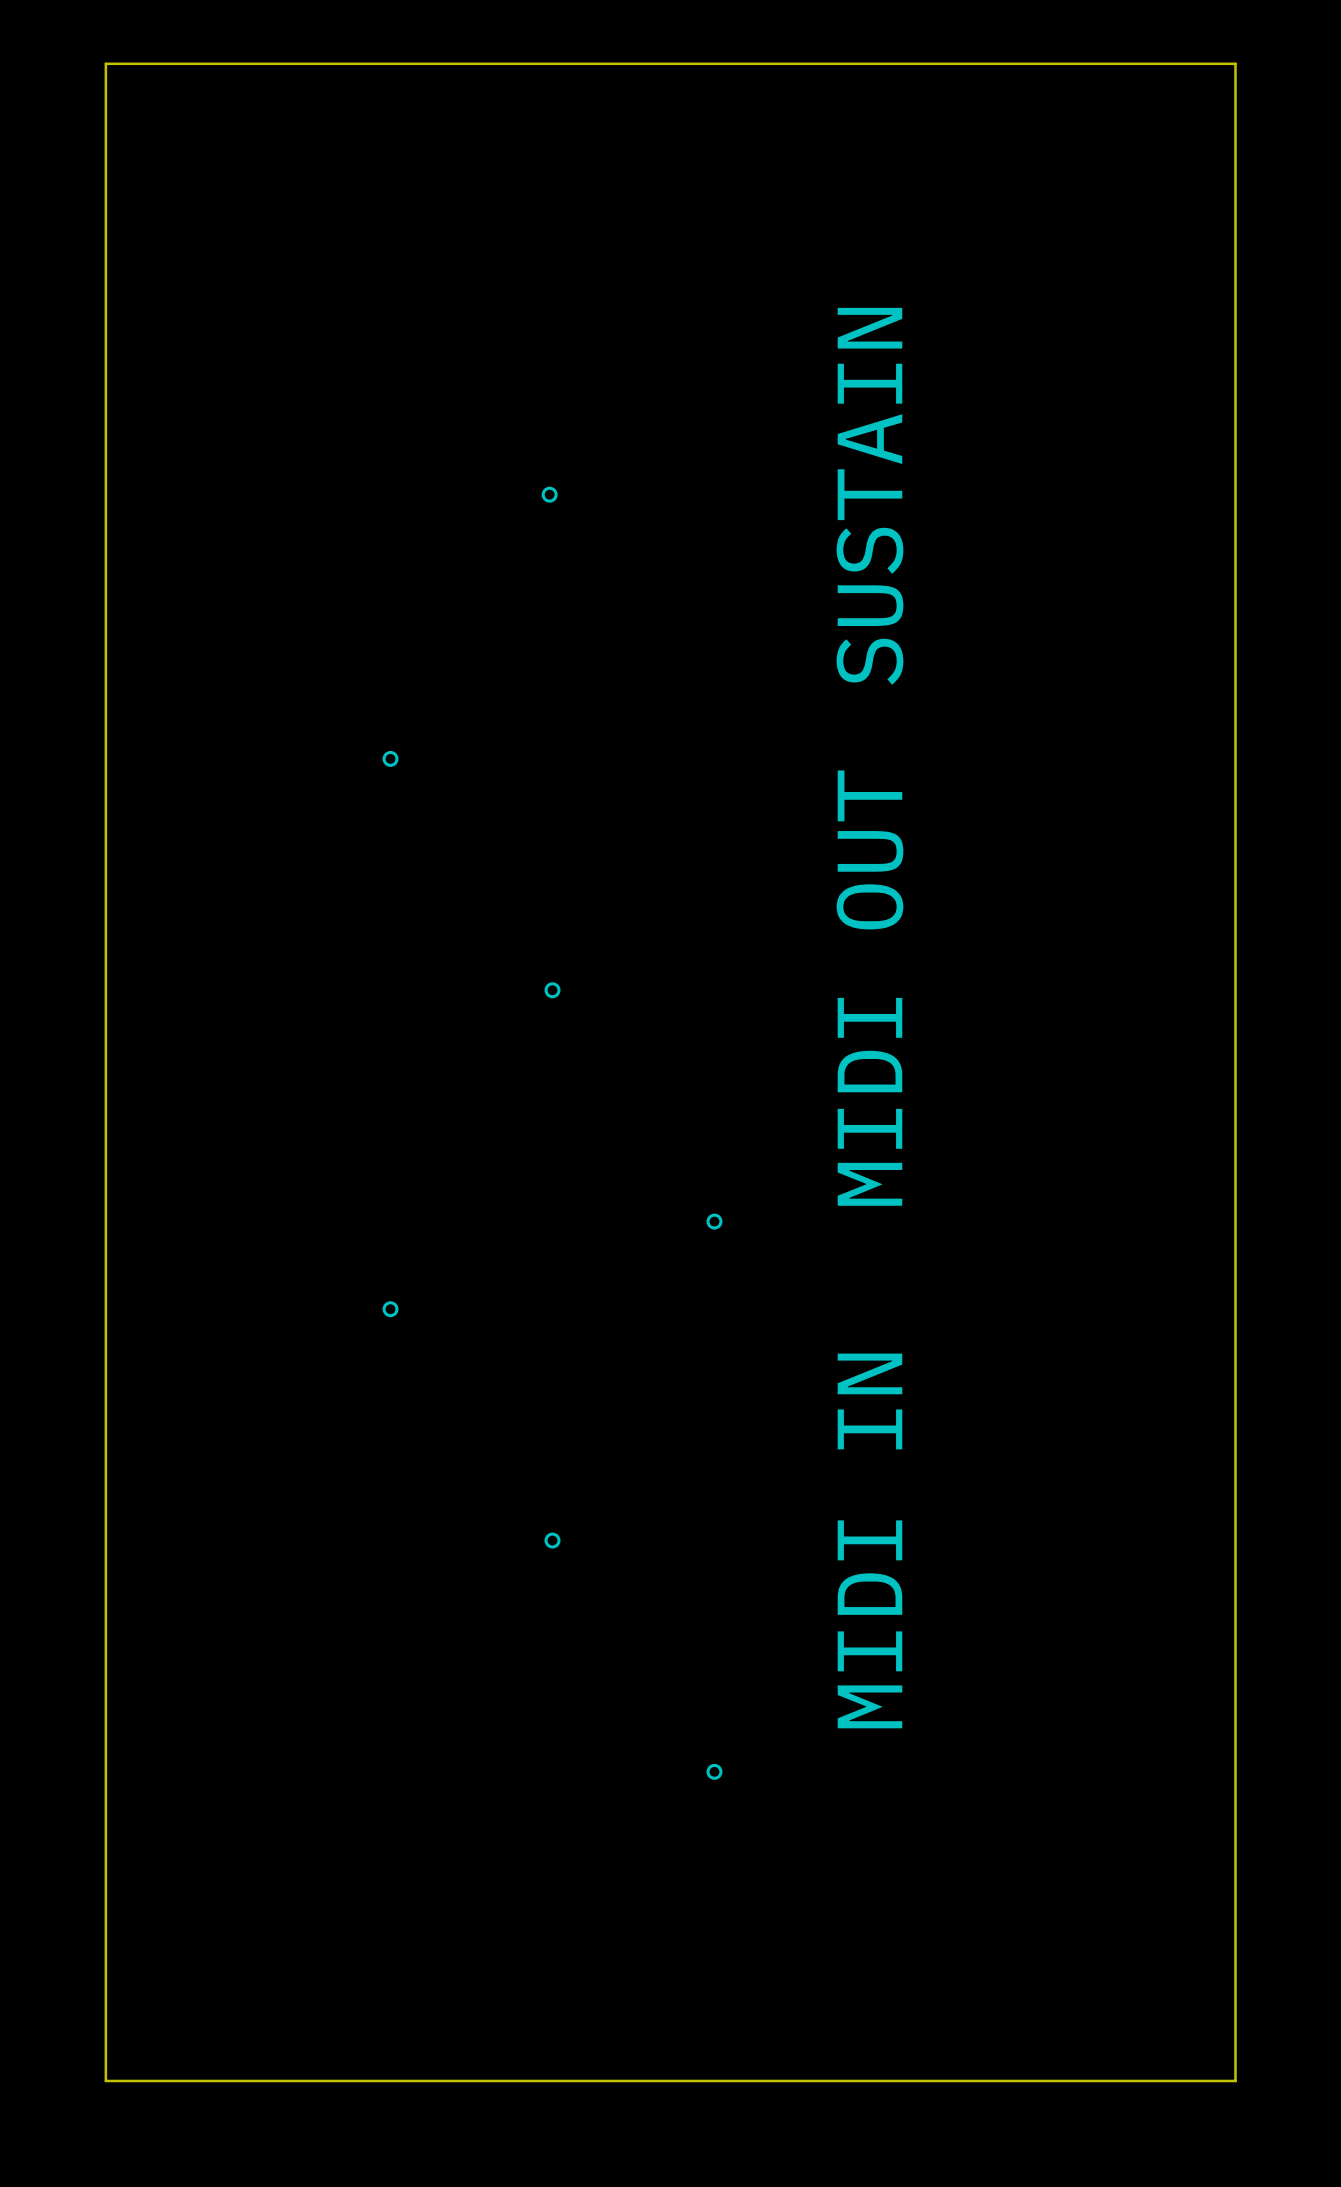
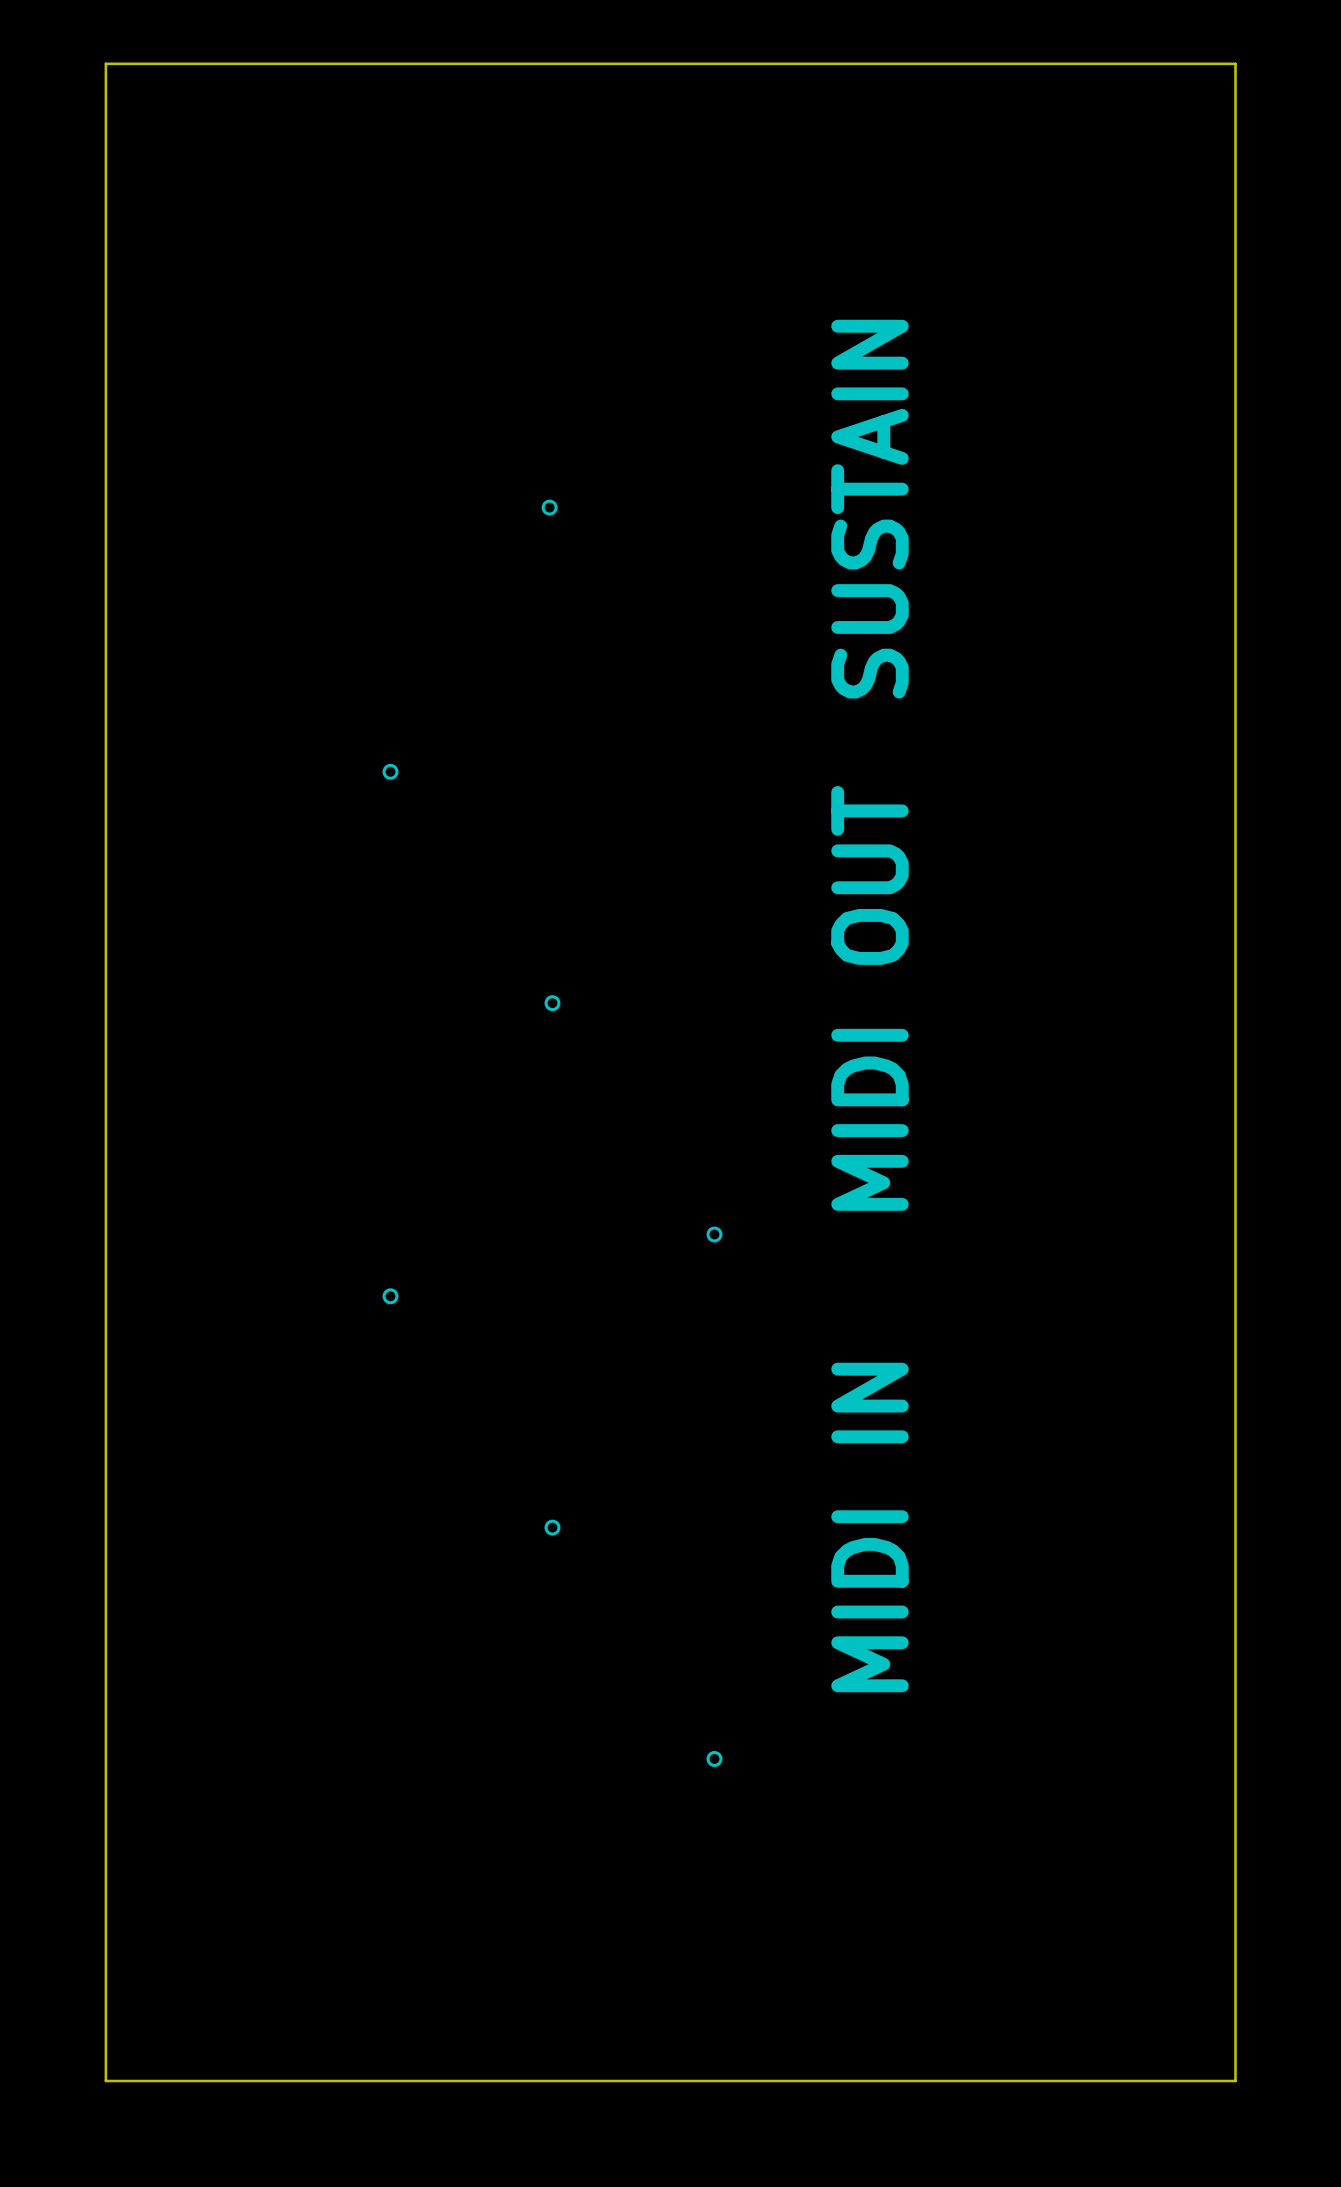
drawing position: (549, 494) -> (549, 507)
text position: SUSTAIN (869, 496) -> SUSTAIN (869, 509)
drawing position: (390, 758) -> (390, 771)
text position: MIDI OUT (869, 988) -> MIDI OUT (869, 998)
drawing position: (552, 990) -> (552, 1003)
drawing position: (714, 1221) -> (714, 1234)
drawing position: (390, 1309) -> (390, 1296)
drawing position: (552, 1540) -> (552, 1527)
text position: MIDI IN (869, 1540) -> MIDI IN (869, 1527)
drawing position: (714, 1771) -> (714, 1758)

